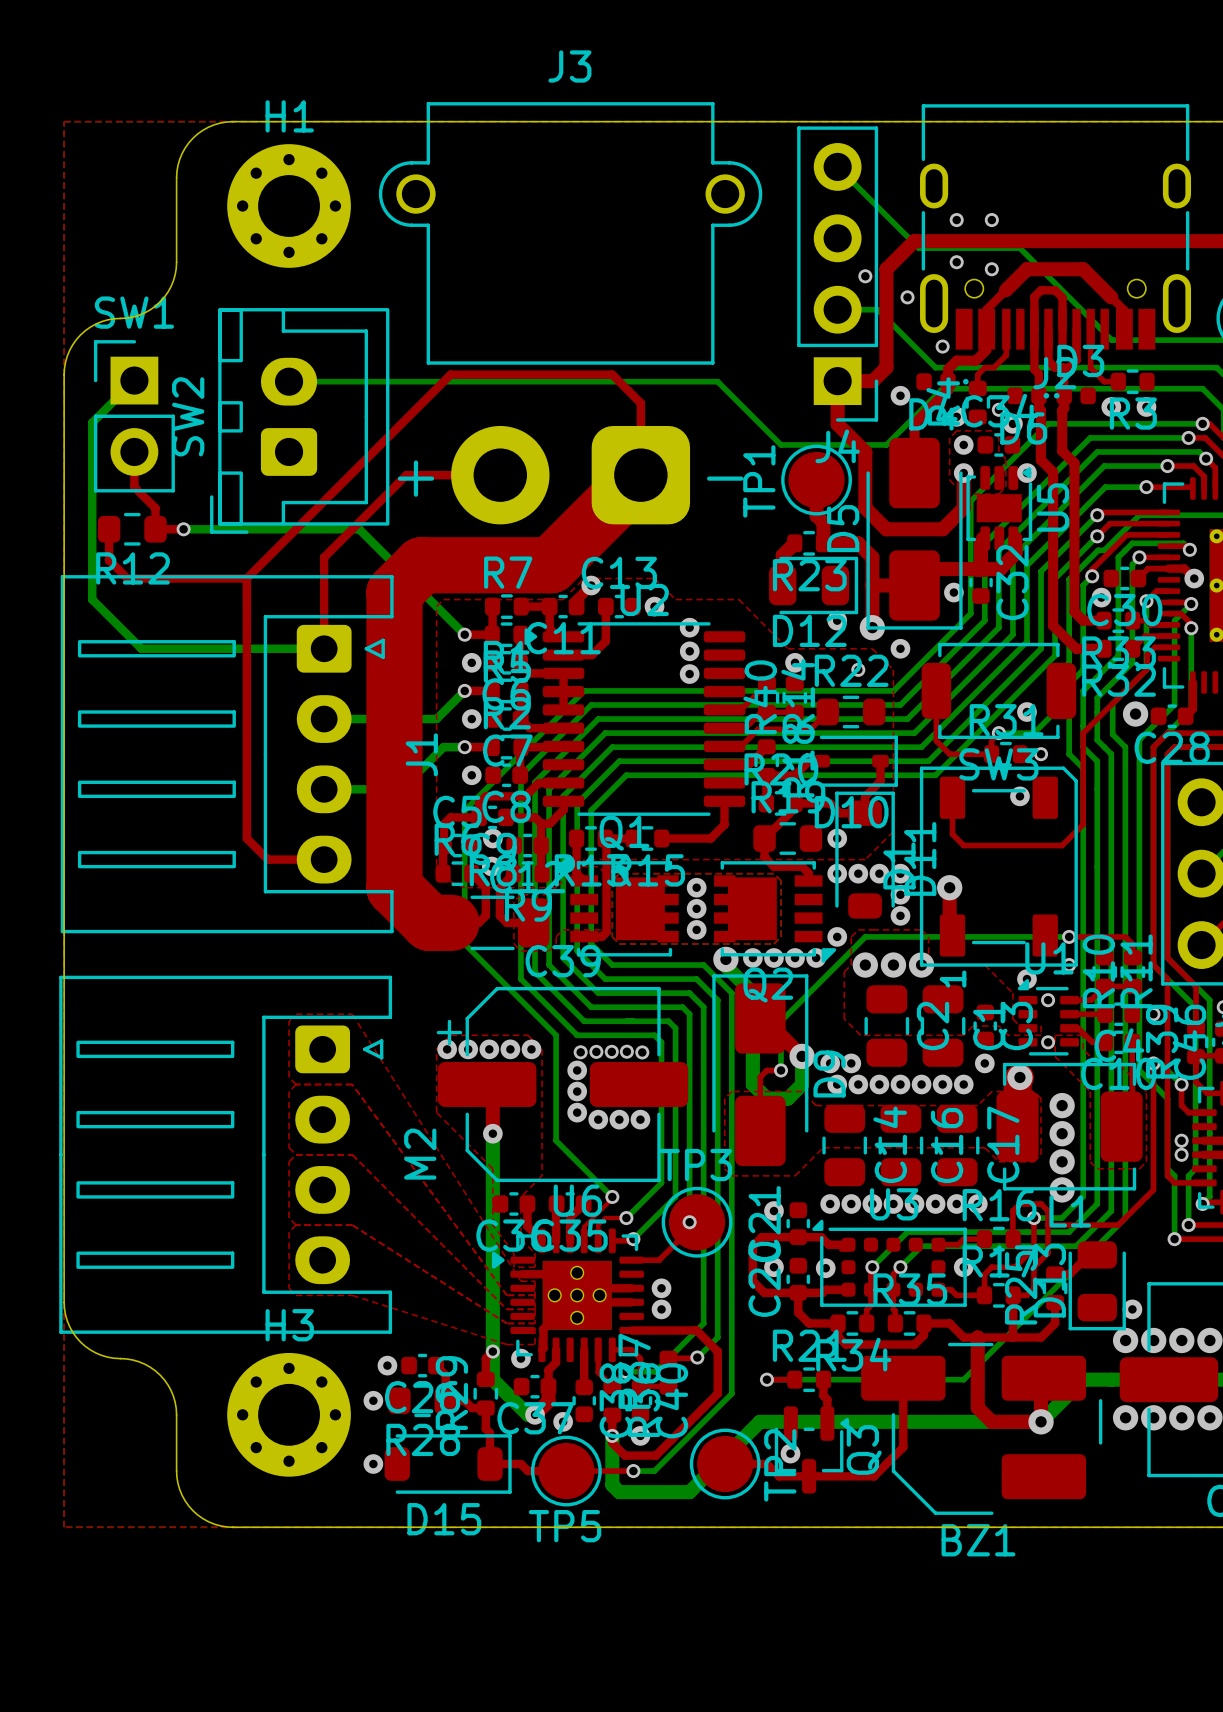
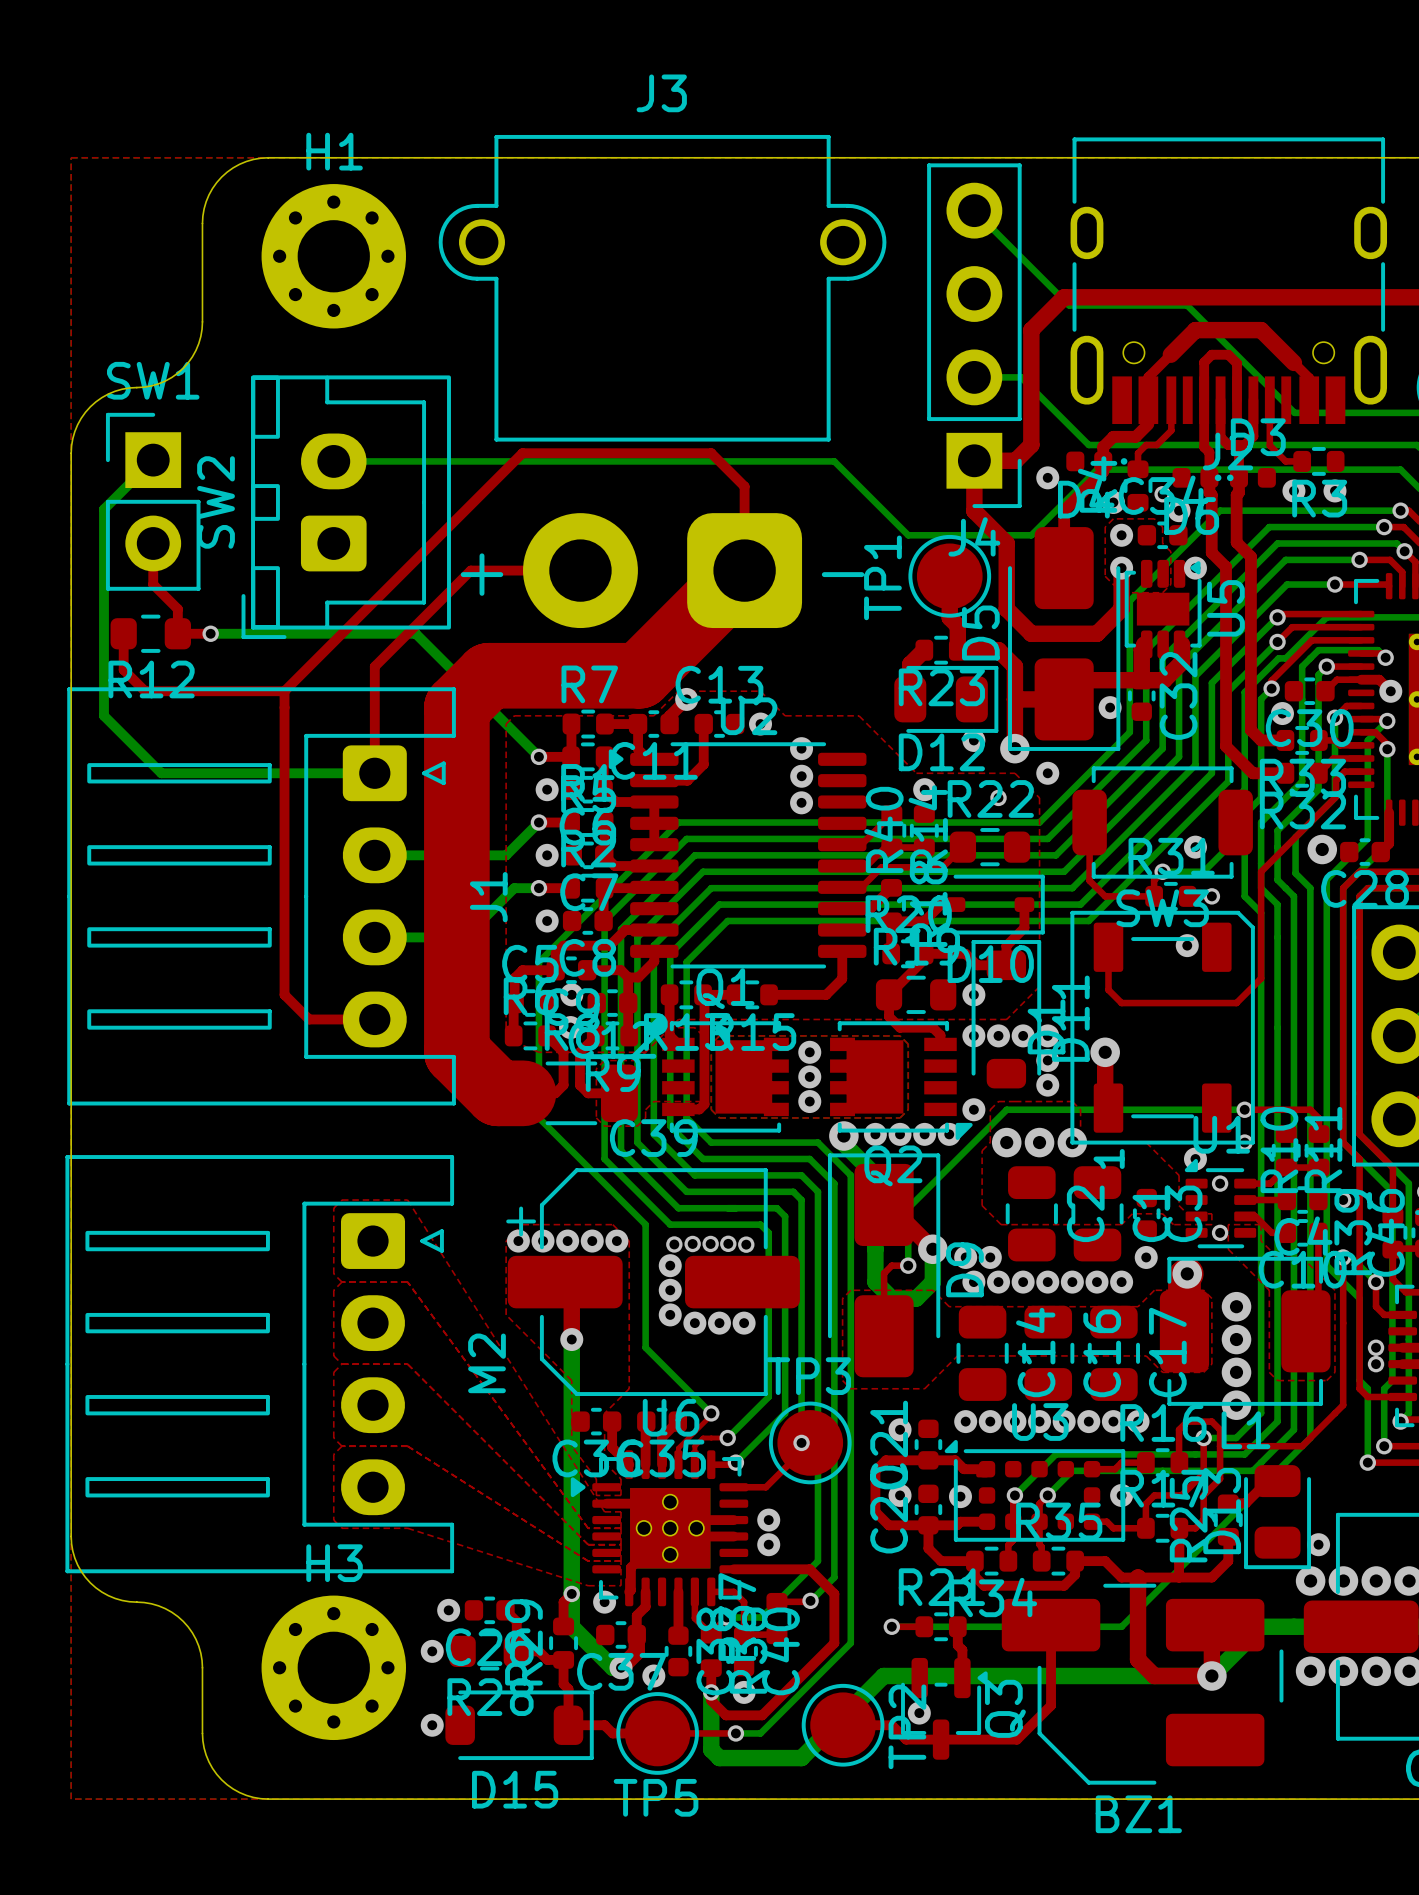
via: (956, 220) -> none
via: (991, 220) -> none
via: (956, 262) -> none
via: (991, 269) -> none
via: (865, 276) -> none
via: (907, 297) -> none
via: (942, 346) -> none

